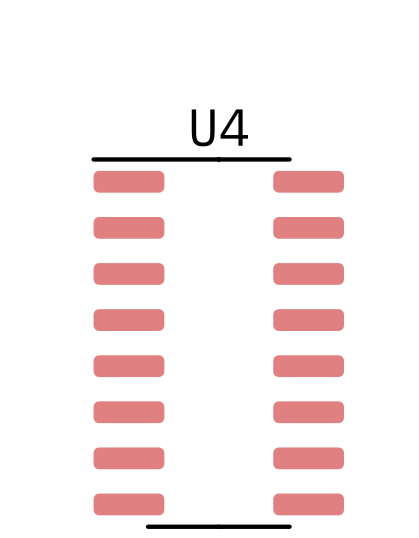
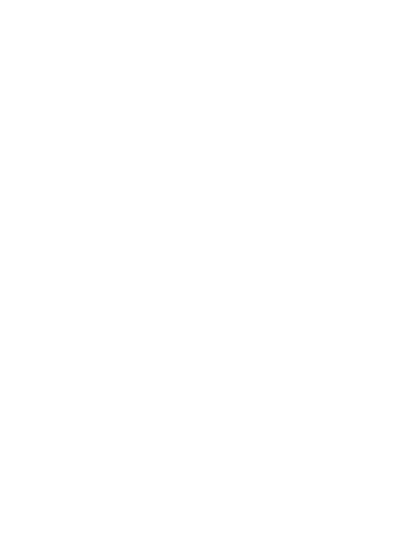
U4: (217, 343) -> none

